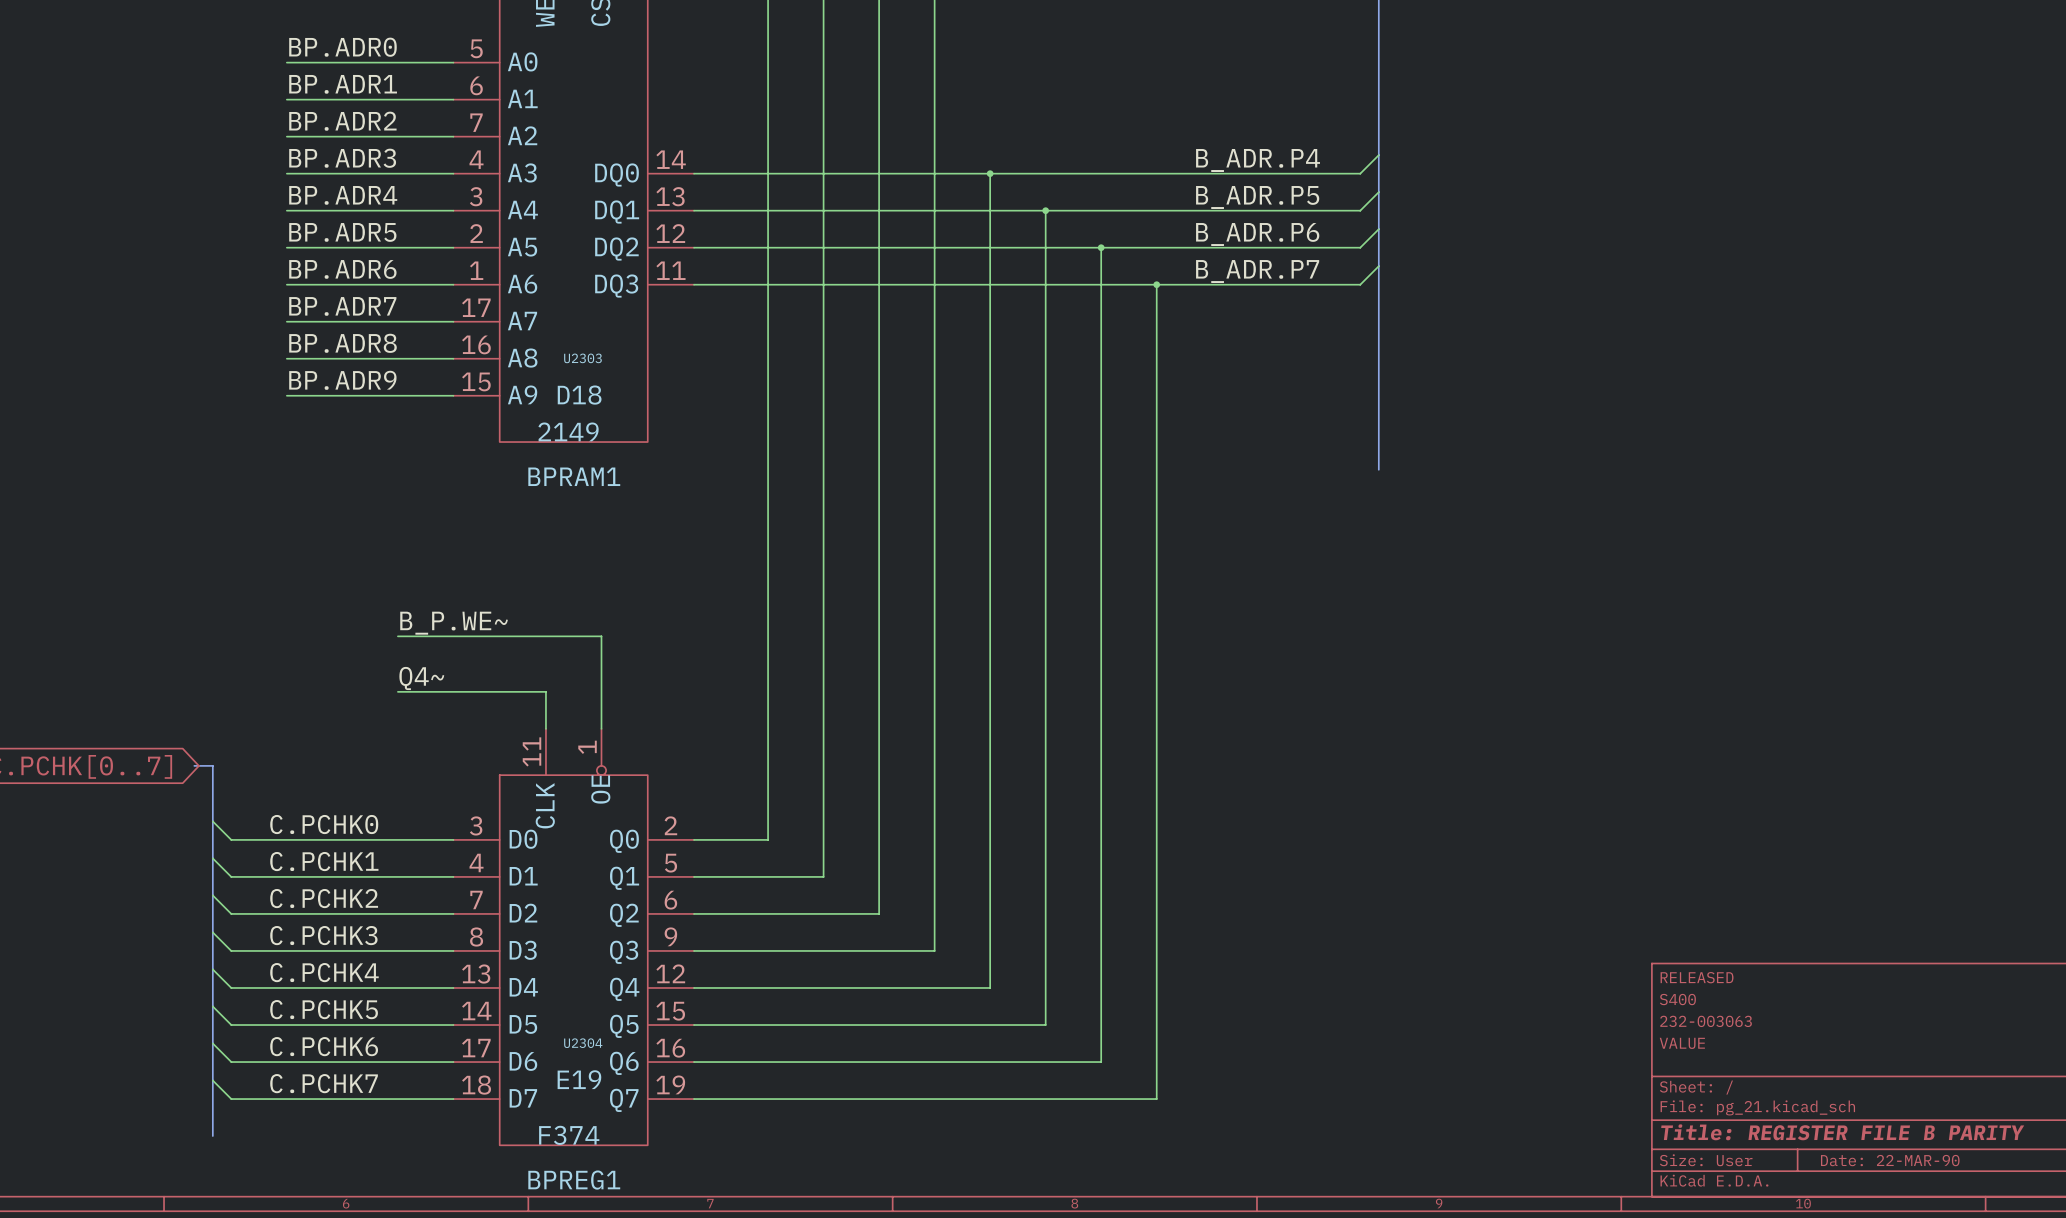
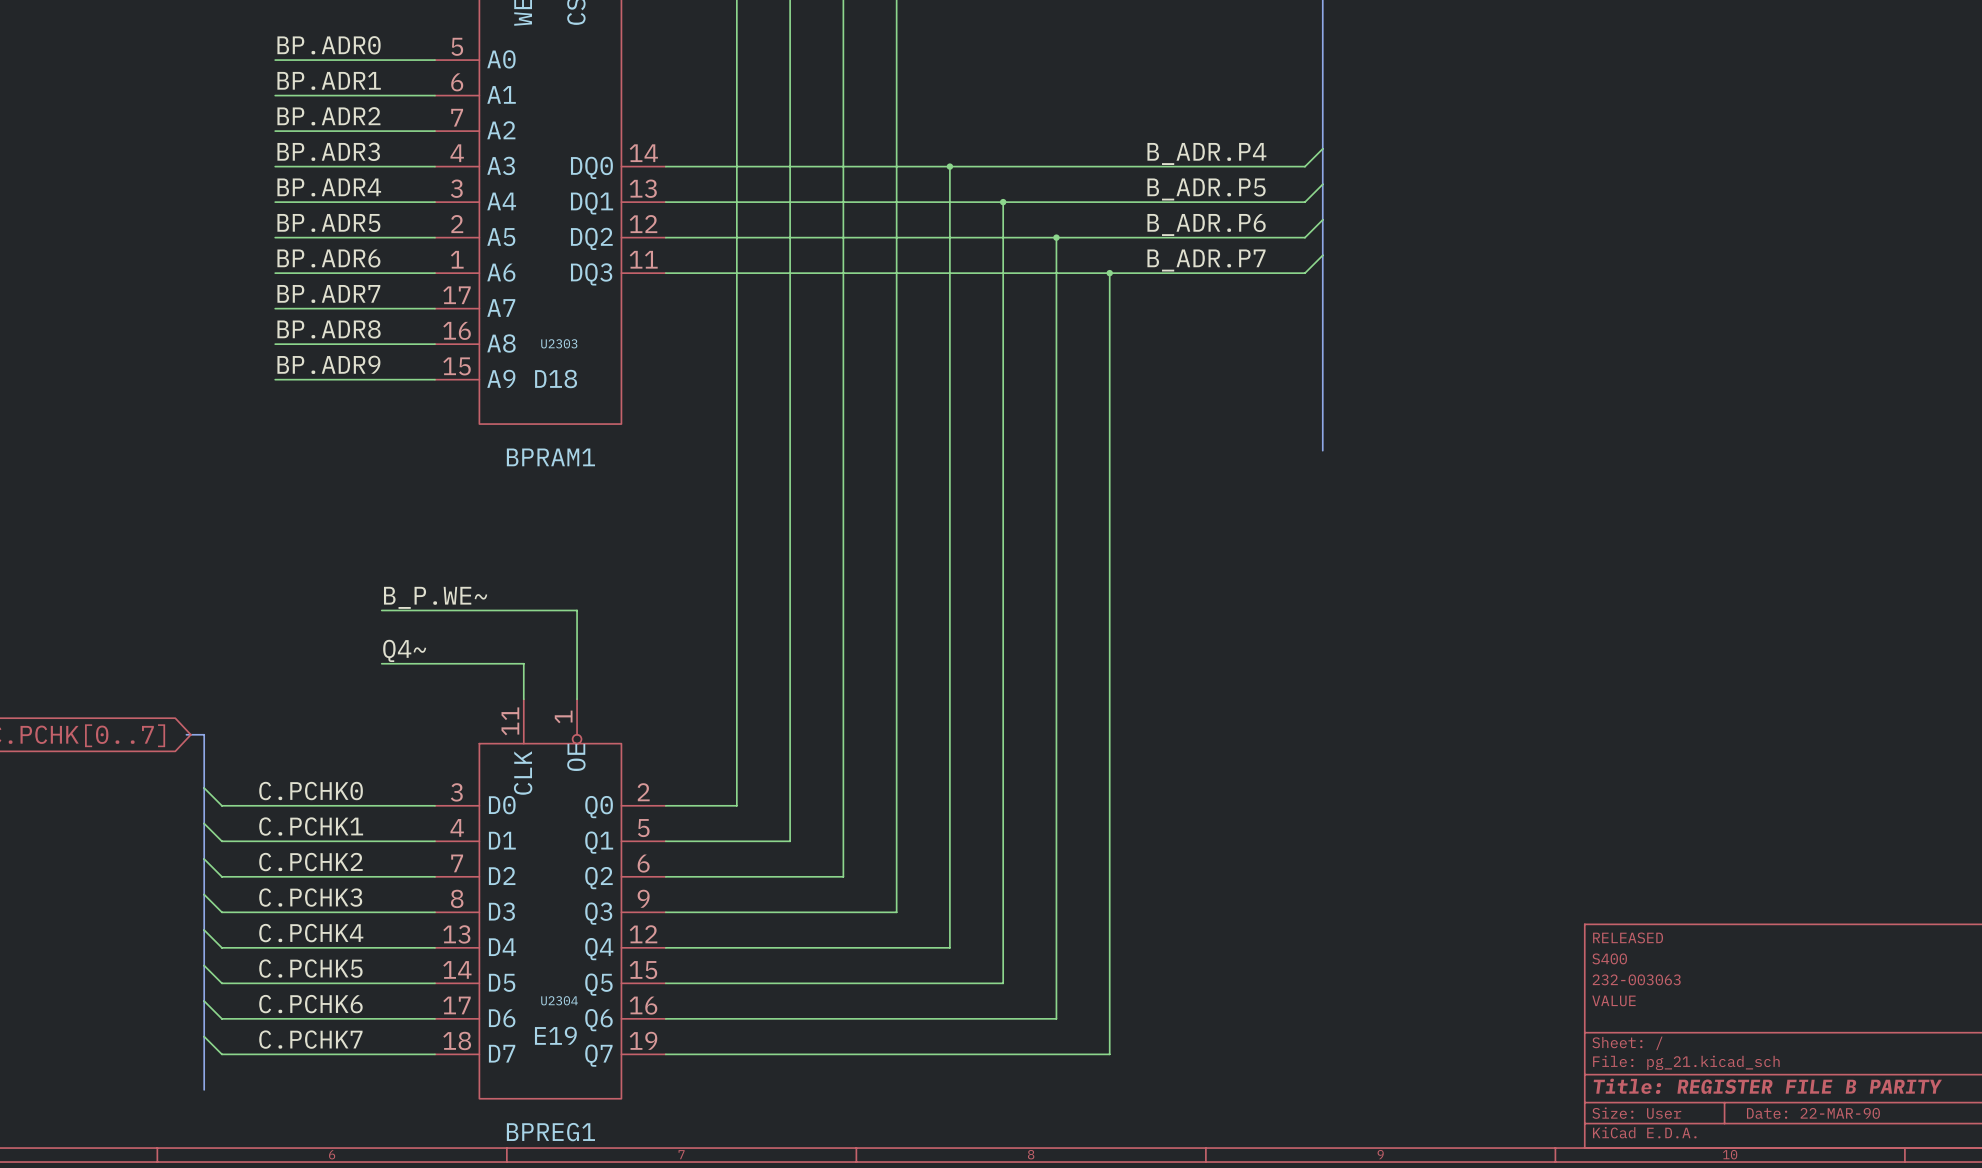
U2303 value: 2149 (568, 431) -> none
U2304 value: F374 (569, 1135) -> none

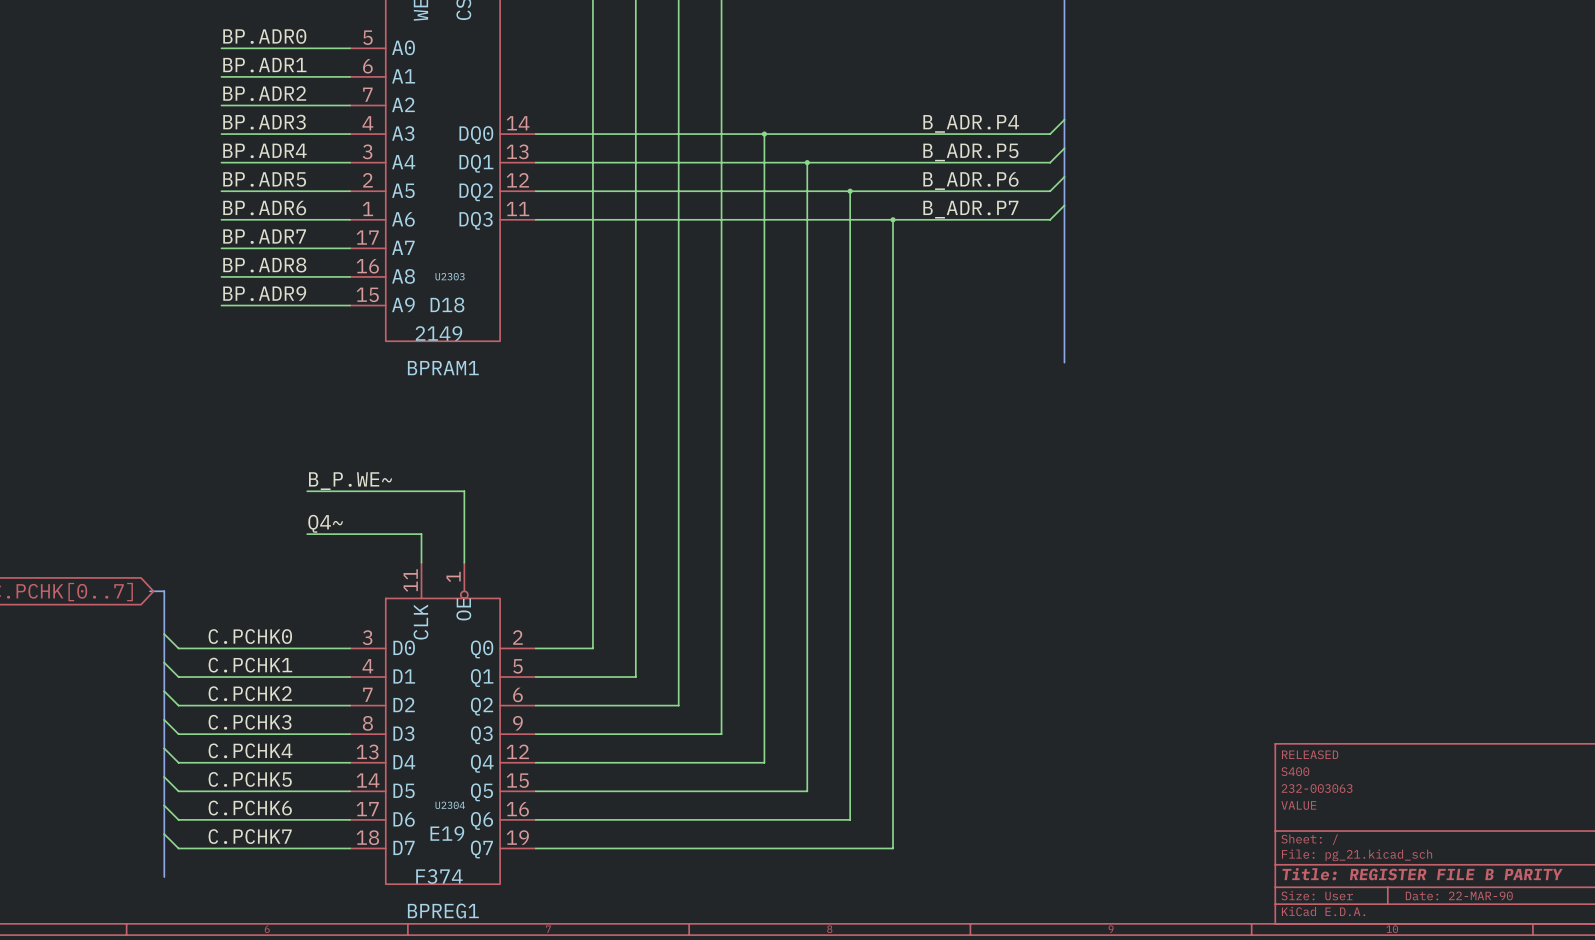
U2303 value: none -> 2149 (438, 333)
U2304 value: none -> F374 (439, 876)

